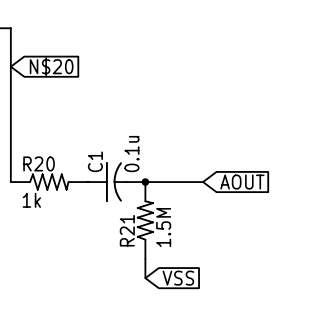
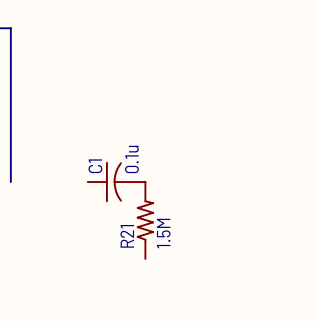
global label: N$20 (51, 66) -> none
R20: 1k (49, 182) -> none
wire: (145, 182) (203, 182) -> none
junction: (145, 182) -> none
global label: AOUT (242, 182) -> none
wire: (145, 258) (145, 278) -> none
global label: VSS (178, 278) -> none

